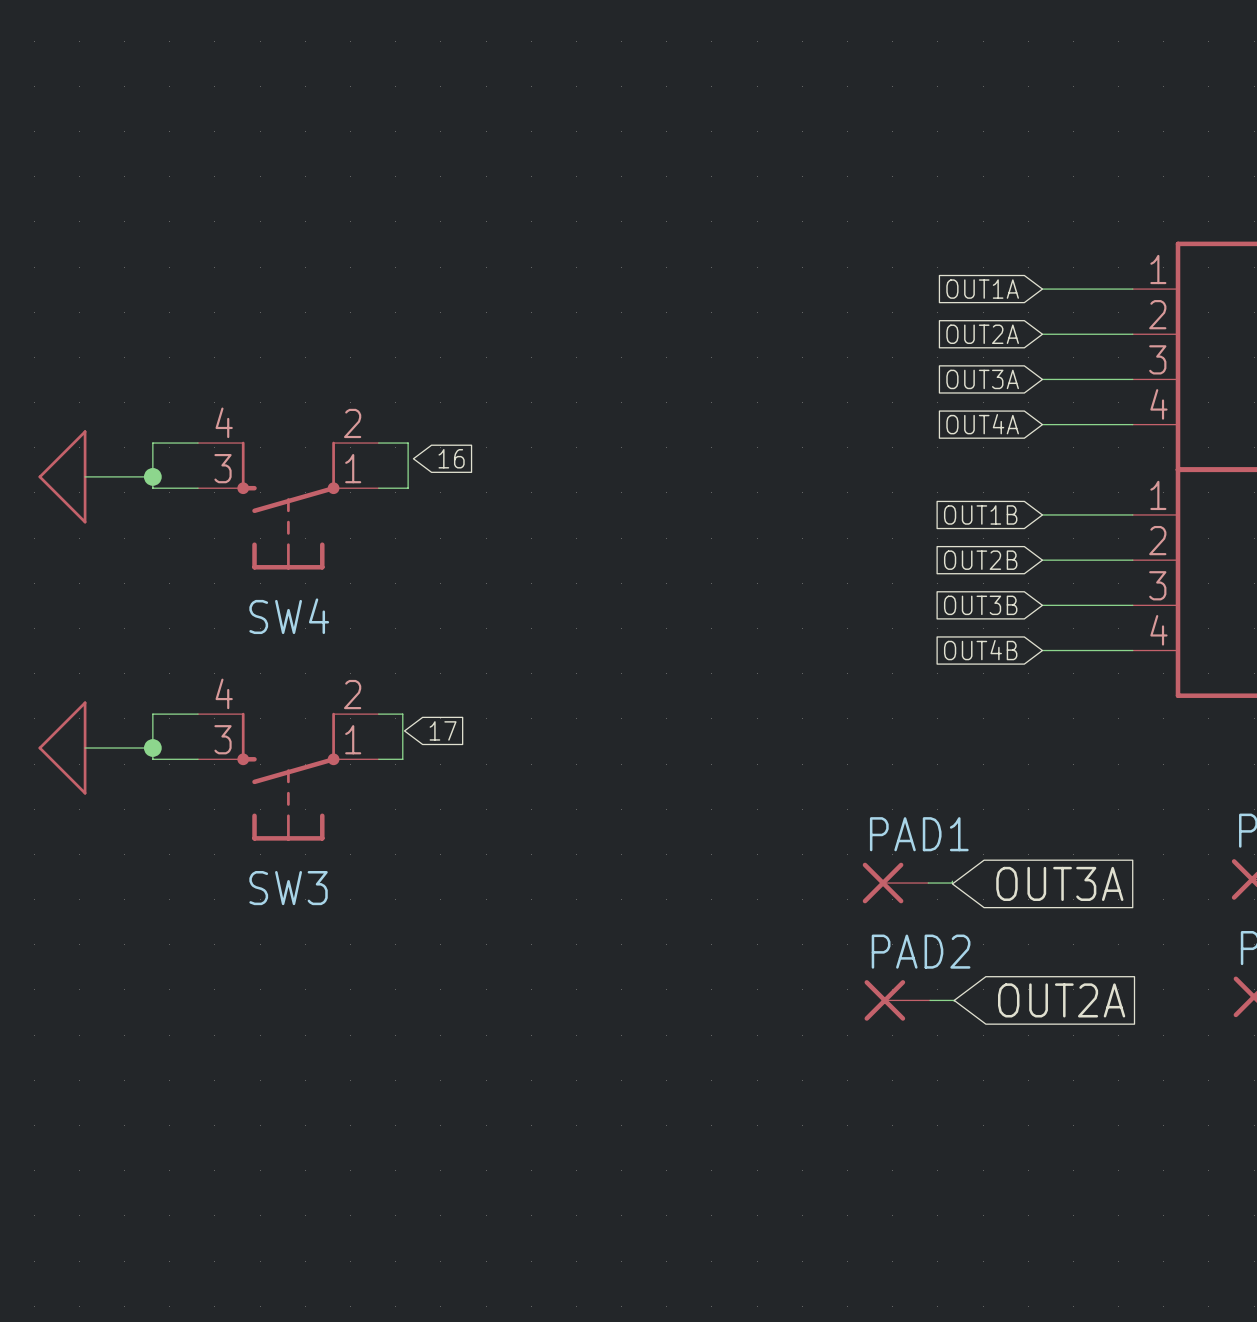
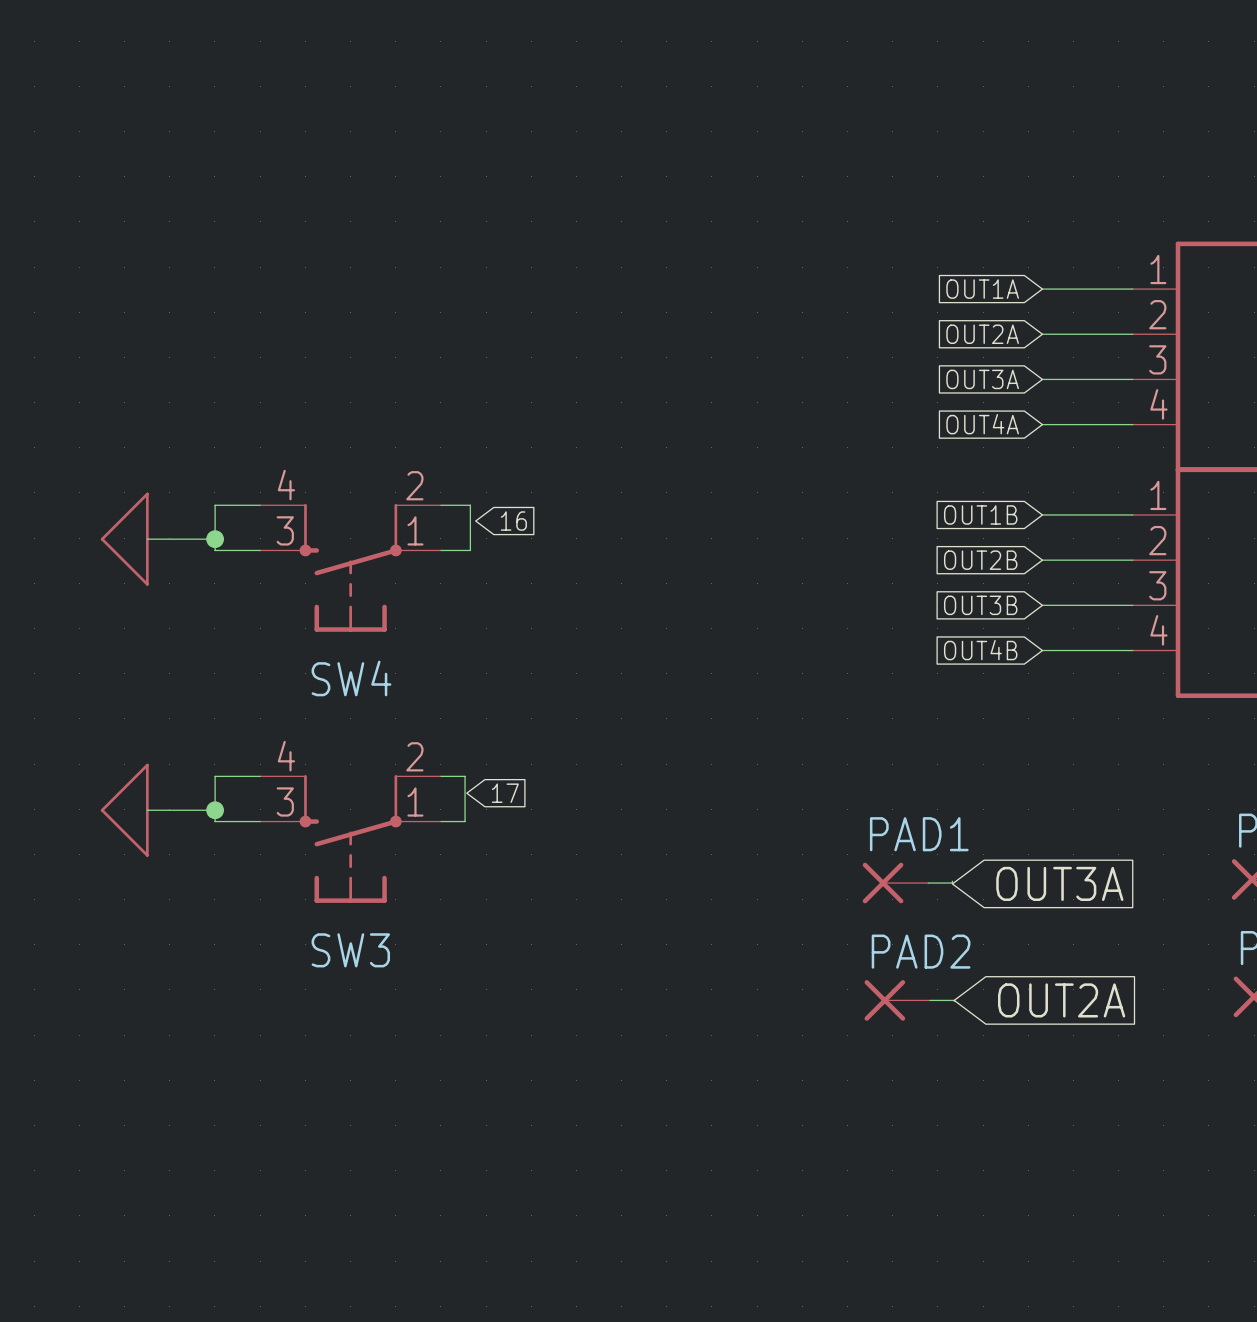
wire: (198, 443) (152, 443) (152, 488) (198, 488) -> (260, 505) (215, 505) (215, 550) (260, 550)
wire: (378, 443) (408, 443) (408, 488) (378, 488) -> (441, 505) (470, 505) (470, 550) (441, 550)
global label position: 16 (451, 458) -> 16 (513, 521)
power symbol position: (62, 476) -> (124, 539)
wire: (85, 476) (152, 476) -> (147, 539) (215, 539)
junction position: (152, 476) -> (215, 539)
SW4 position: (288, 505) -> (350, 567)
wire: (198, 714) (152, 714) (152, 759) (198, 759) -> (260, 776) (215, 776) (215, 821) (260, 821)
wire: (378, 714) (402, 714) (402, 759) (378, 759) -> (441, 776) (465, 776) (465, 821) (441, 821)
global label position: 17 (443, 730) -> 17 (505, 793)
power symbol position: (62, 748) -> (124, 810)
wire: (85, 748) (152, 748) -> (147, 810) (215, 810)
junction position: (152, 748) -> (215, 810)
SW3 position: (288, 776) -> (350, 838)

